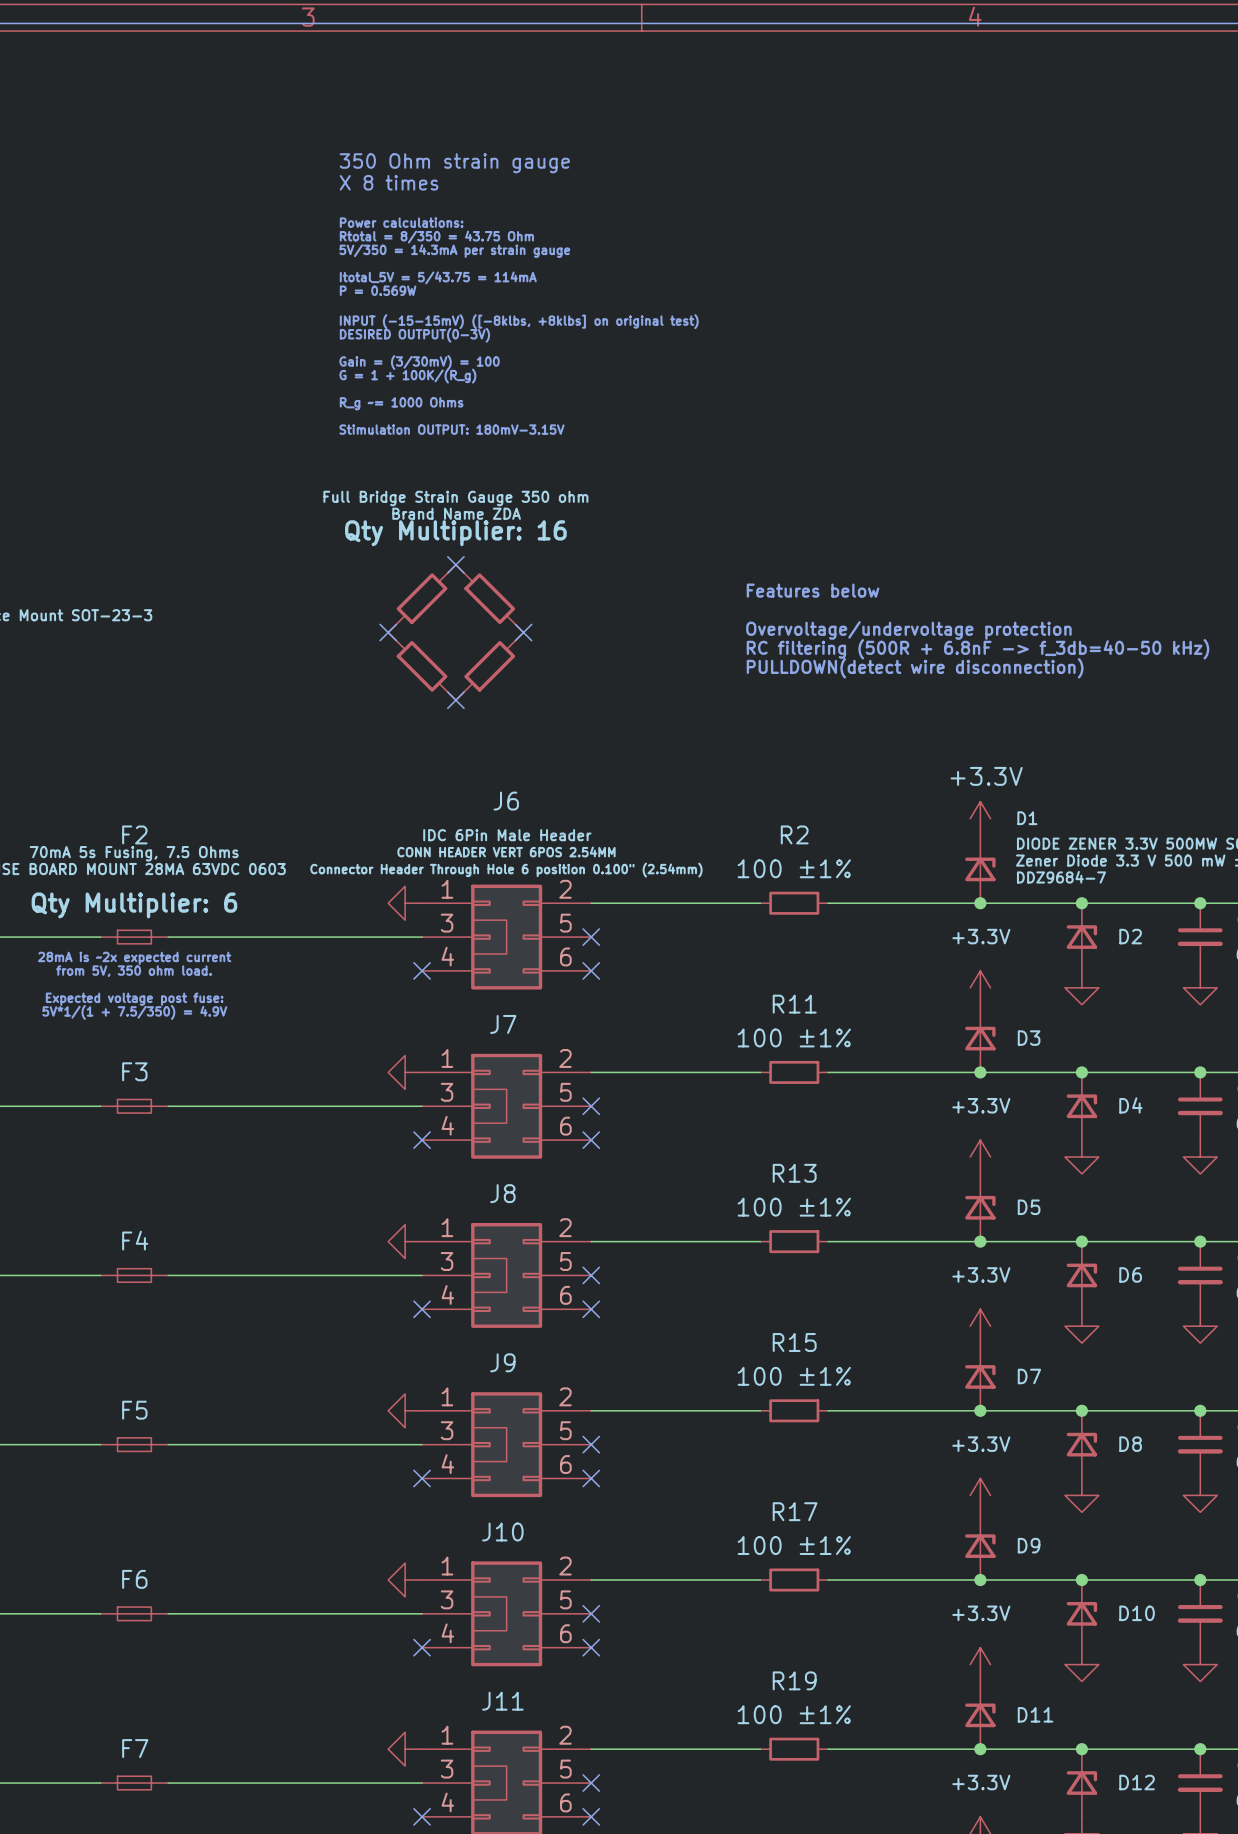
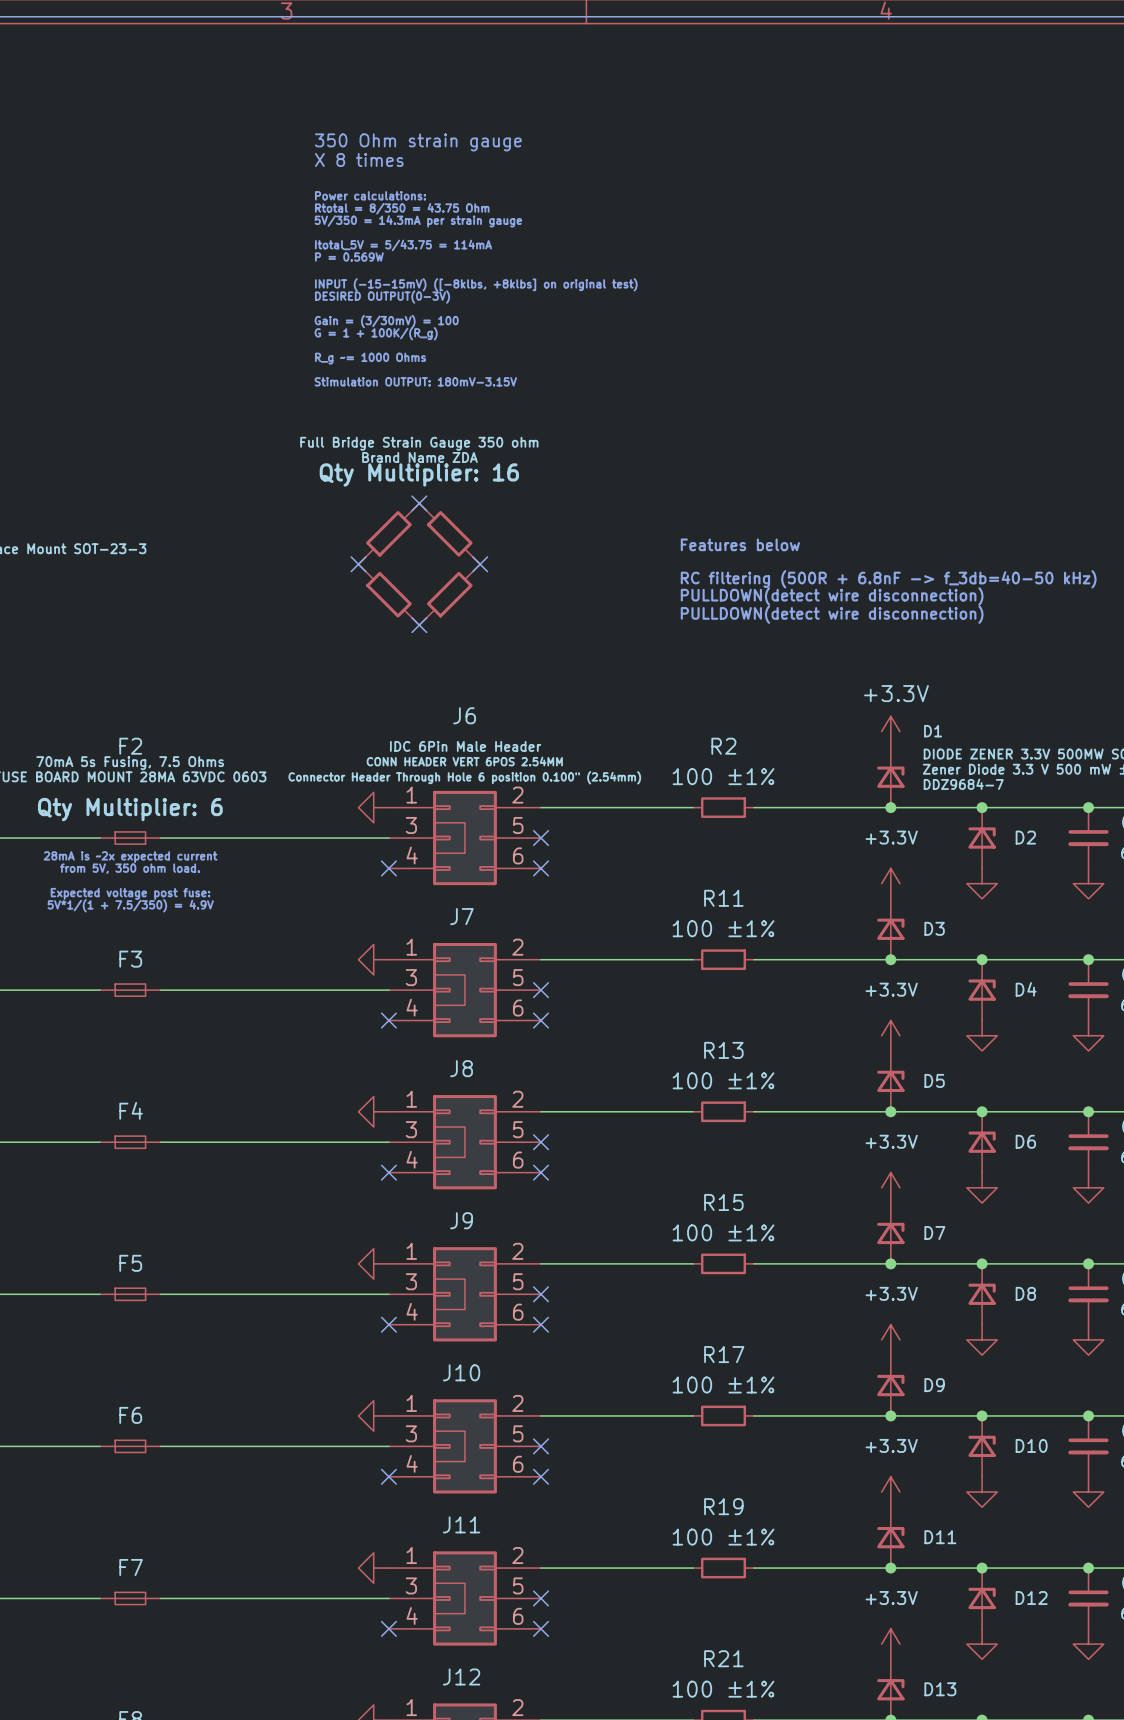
text position: Features below (813, 590) -> Features below (740, 544)
text: Overvoltage/undervoltage protection (908, 630) -> none
text: none -> PULLDOWN(detect wire disconnection) (832, 614)

